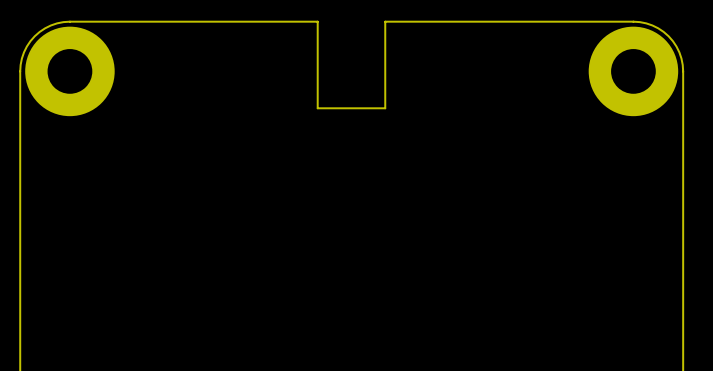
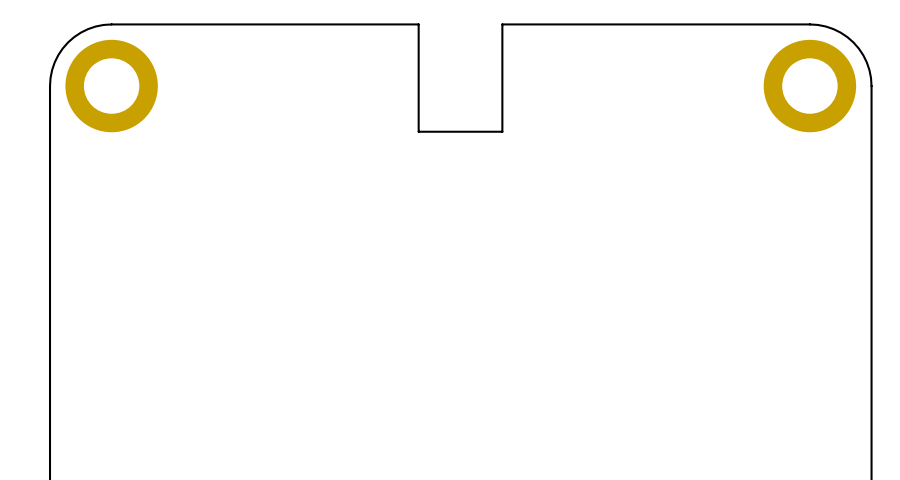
part footprint: [25, 26, 115, 117] -> [65, 39, 158, 133]
part footprint: [588, 26, 679, 117] -> [763, 39, 857, 133]

